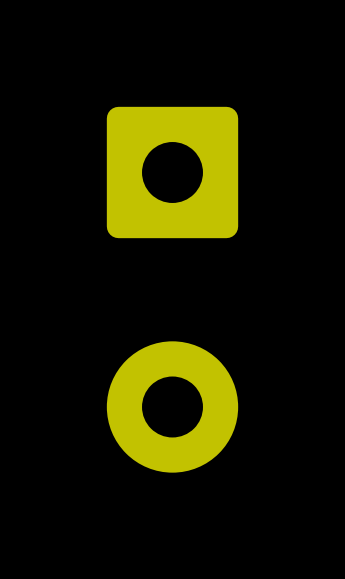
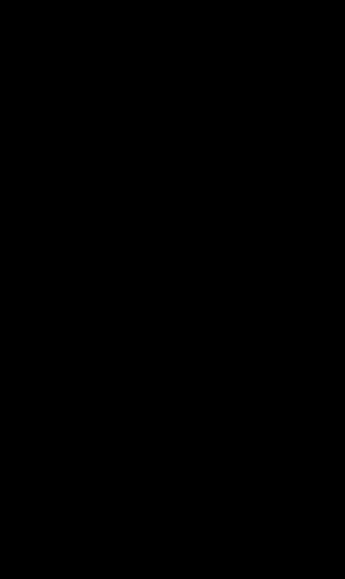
part: (172, 289) -> none

